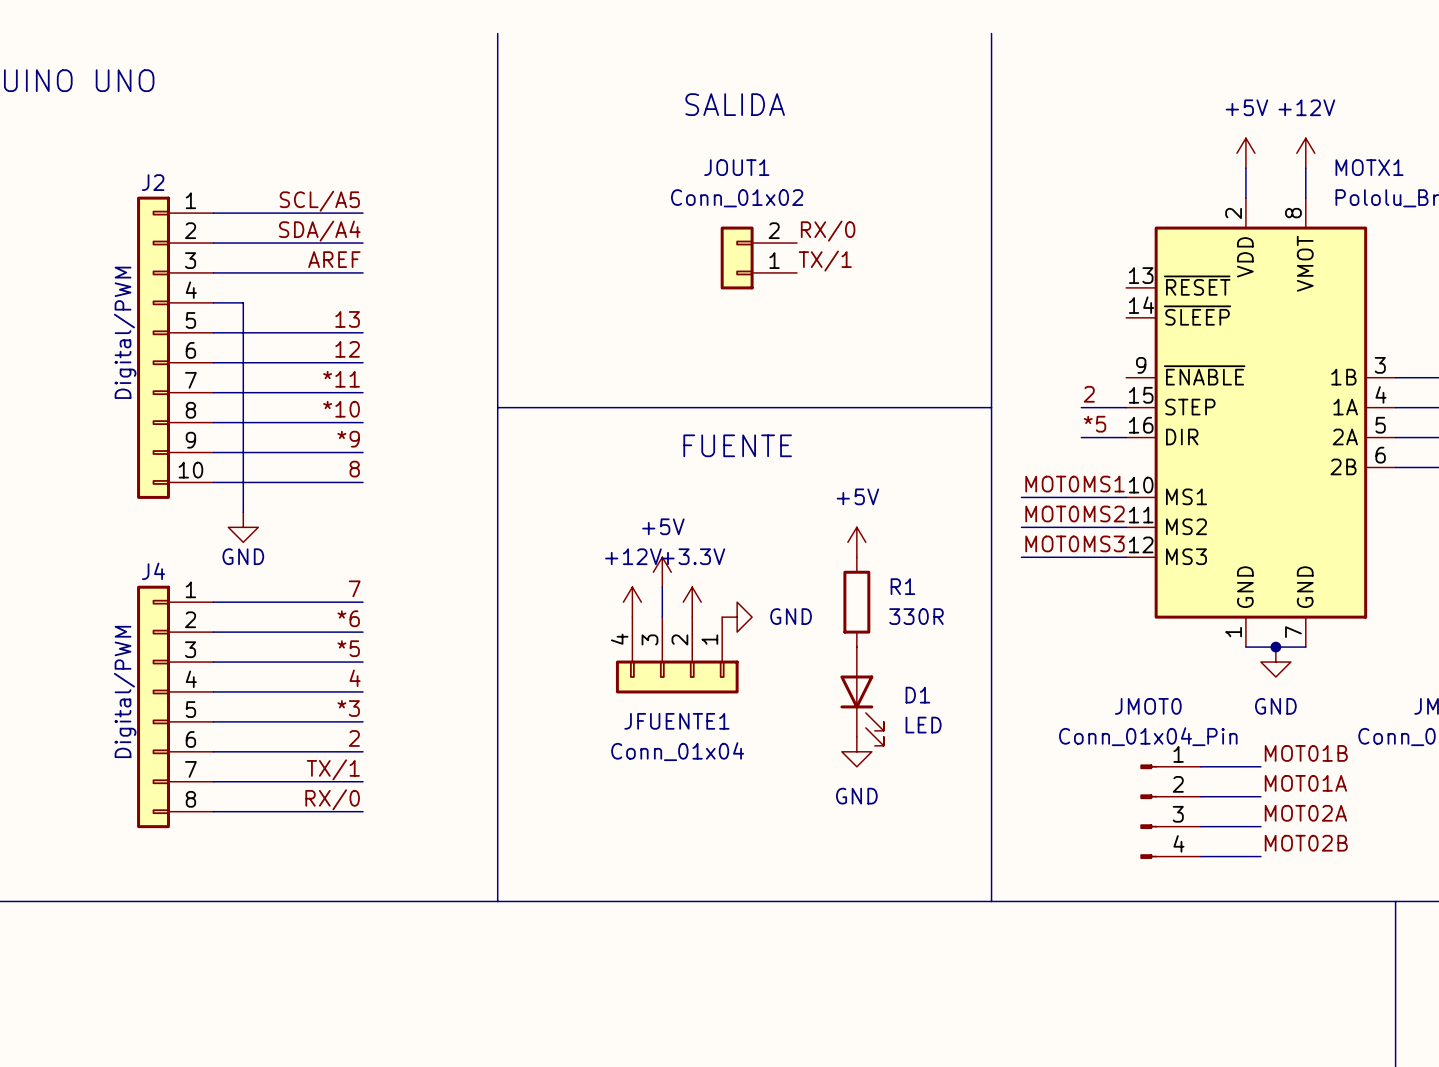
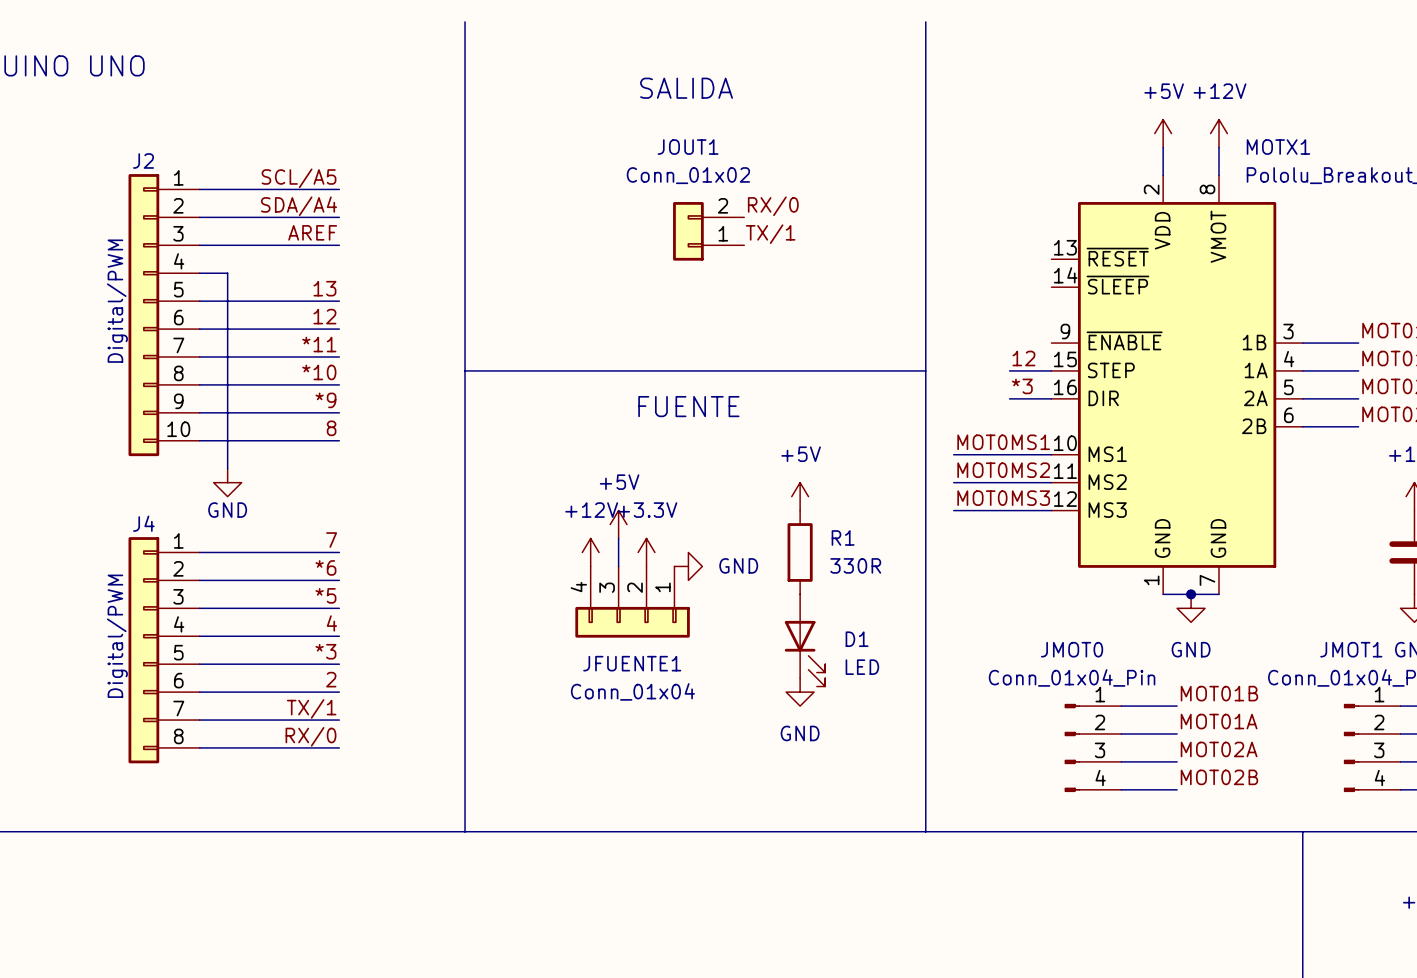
label: 2 (1089, 394) -> 12 (1023, 358)
label: *5 (1094, 424) -> *3 (1022, 386)

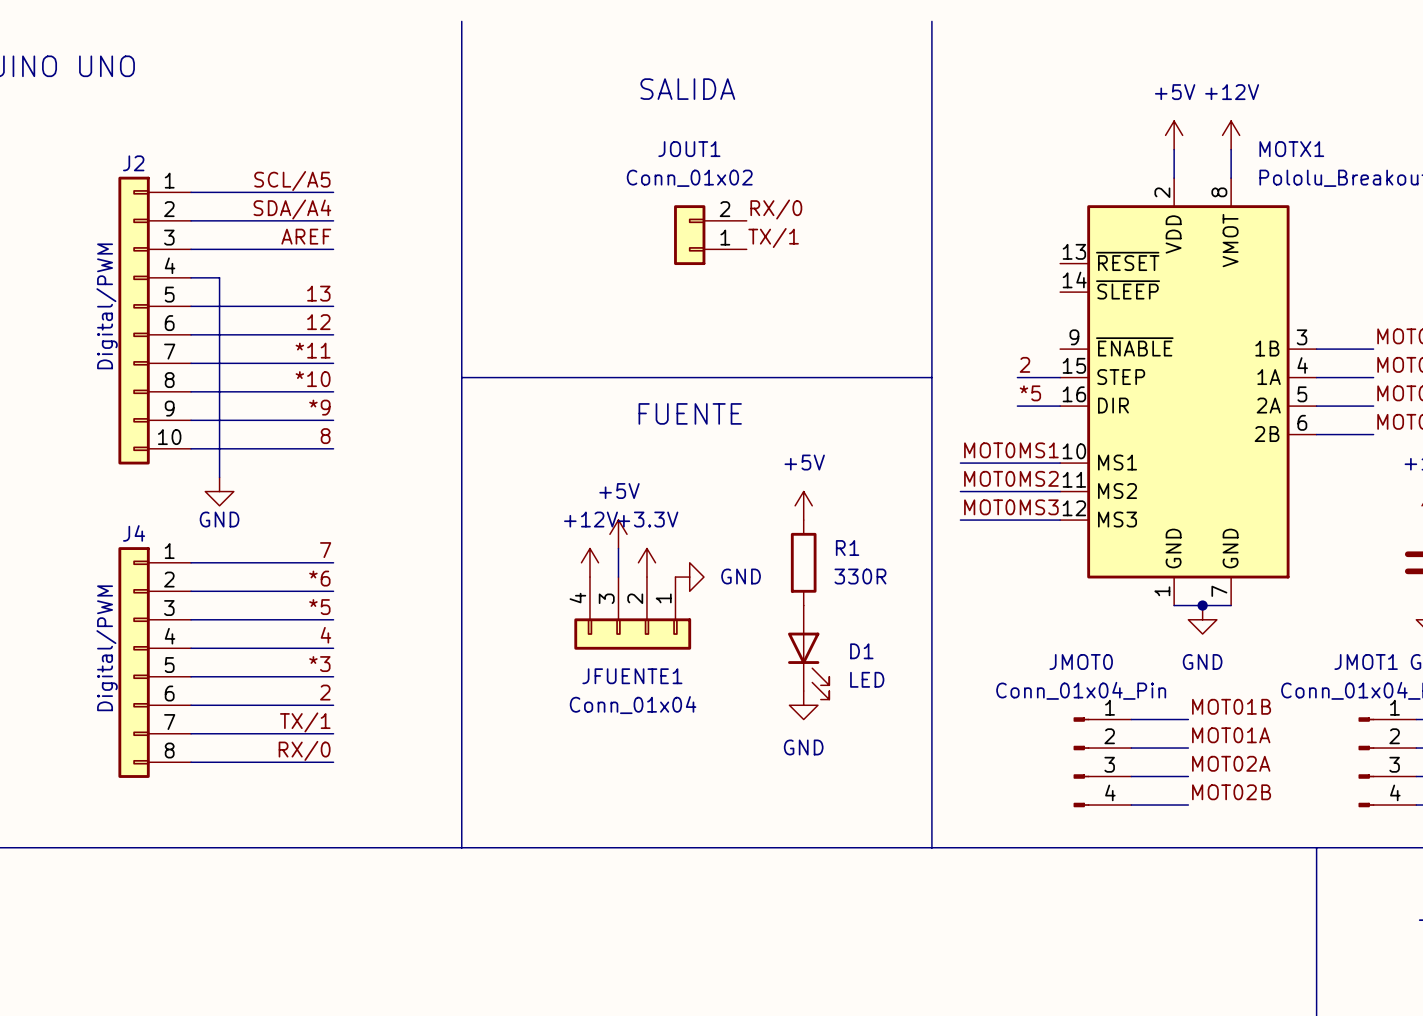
label: 12 (1023, 358) -> 2 (1024, 364)
label: *3 (1022, 386) -> *5 (1030, 393)

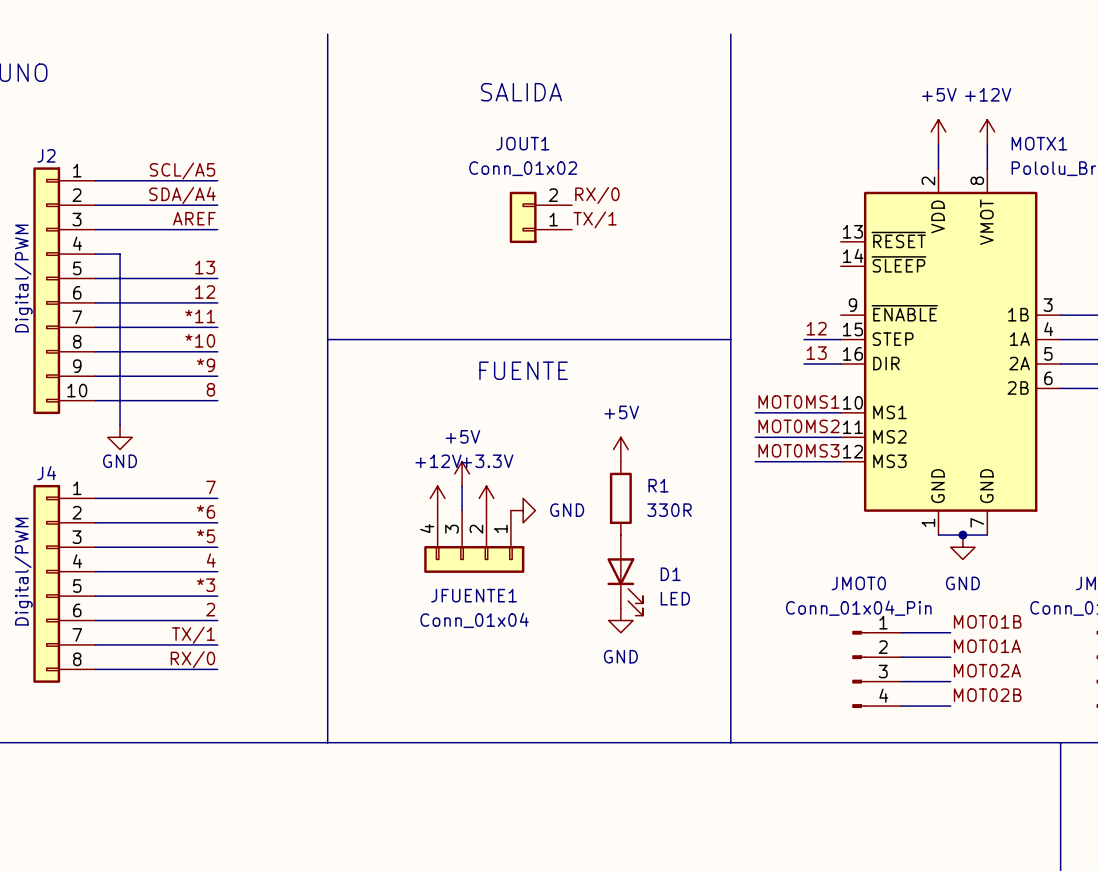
label: 2 (1024, 364) -> 12 (816, 328)
label: *5 (1030, 393) -> 13 (816, 353)

